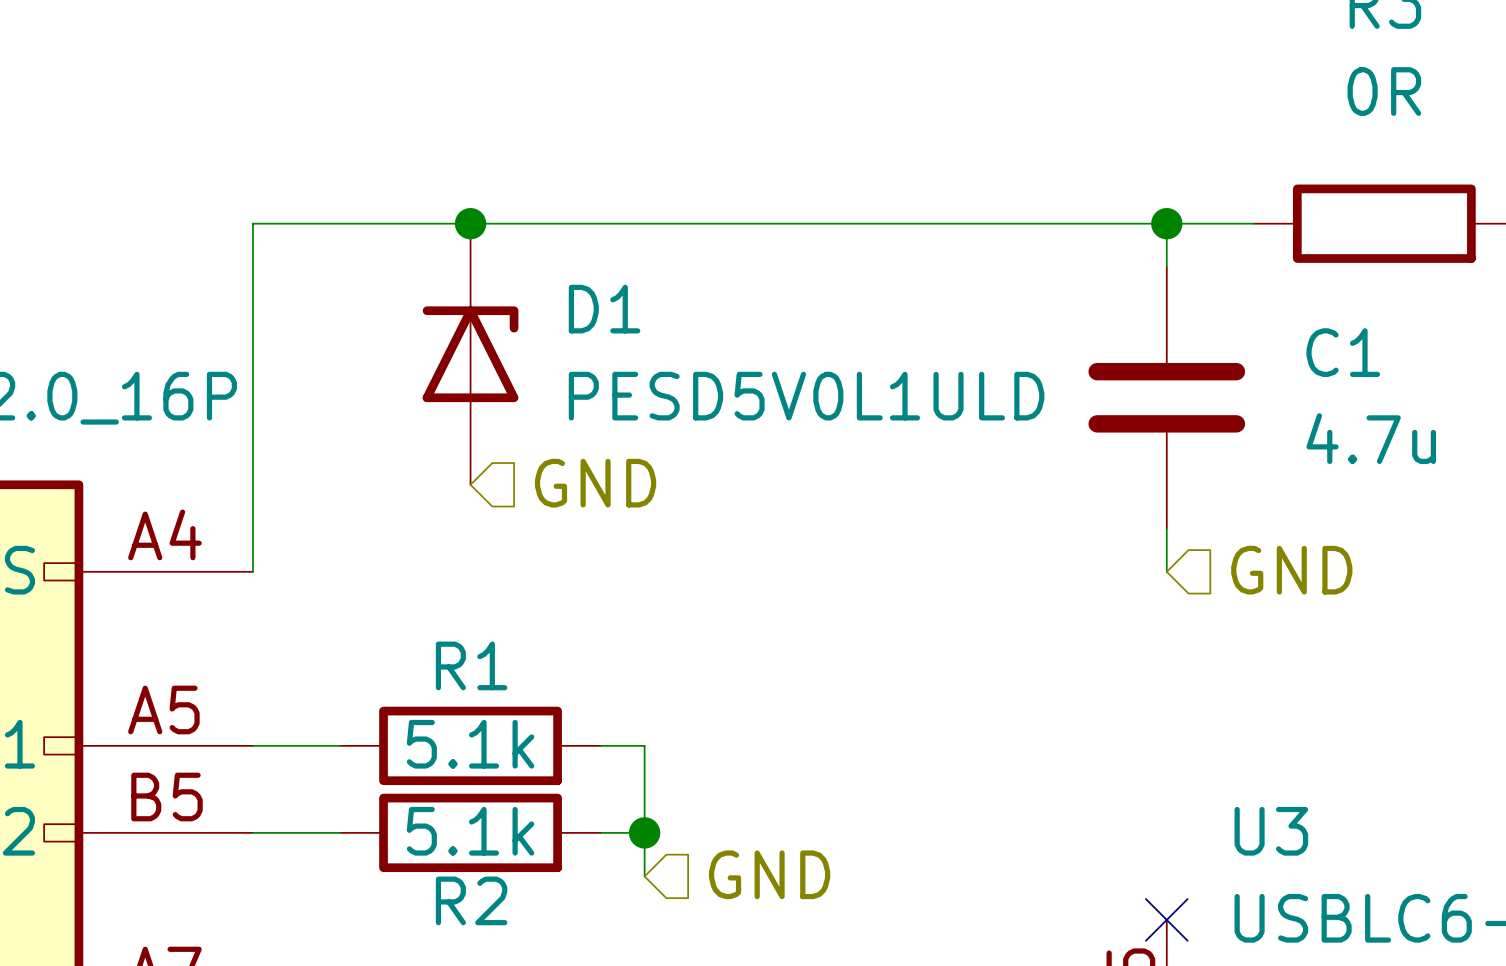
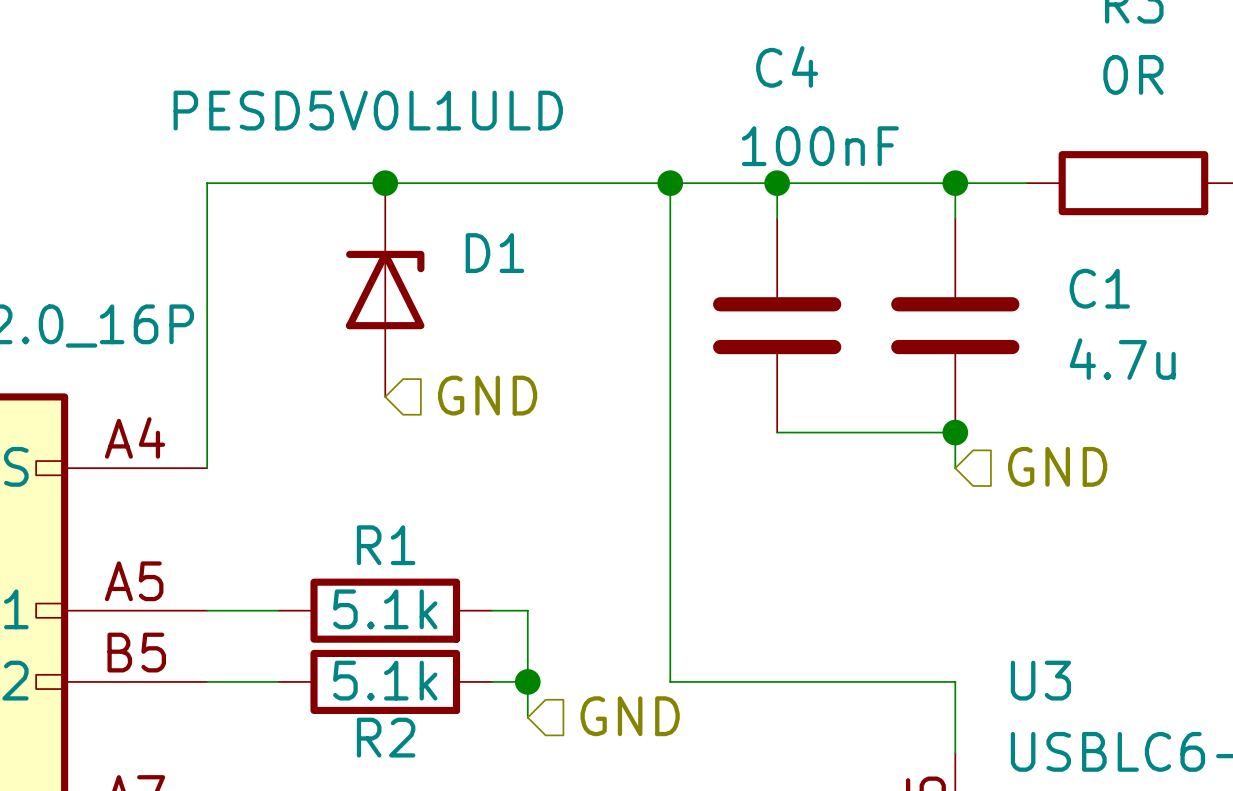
wire: none -> (670, 183) (670, 681) (955, 681) (955, 753)
junction: none -> (670, 183)
wire: none -> (777, 183) (777, 218)
junction: none -> (777, 183)
D1 value position: PESD5V0L1ULD (806, 396) -> PESD5V0L1ULD (368, 110)
C4: none -> 100nF (777, 325)
wire: none -> (777, 432) (955, 432)
junction: none -> (955, 432)
no-connect mark: (1166, 919) -> none

